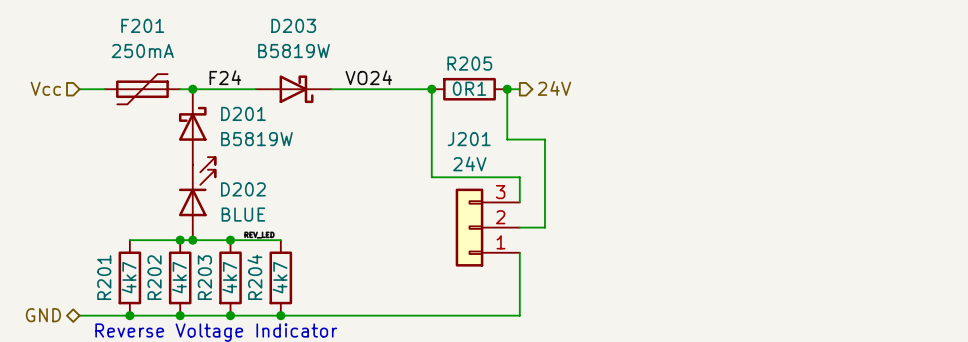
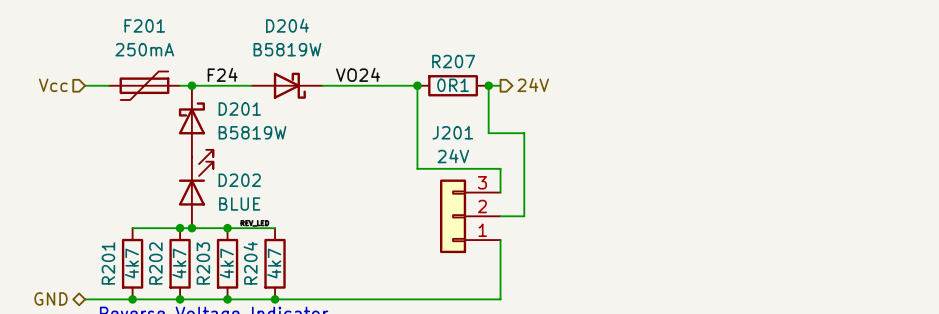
D203 name: D203 (293, 25) -> D204 (287, 25)
R205 name: R205 (469, 63) -> R207 (453, 61)

